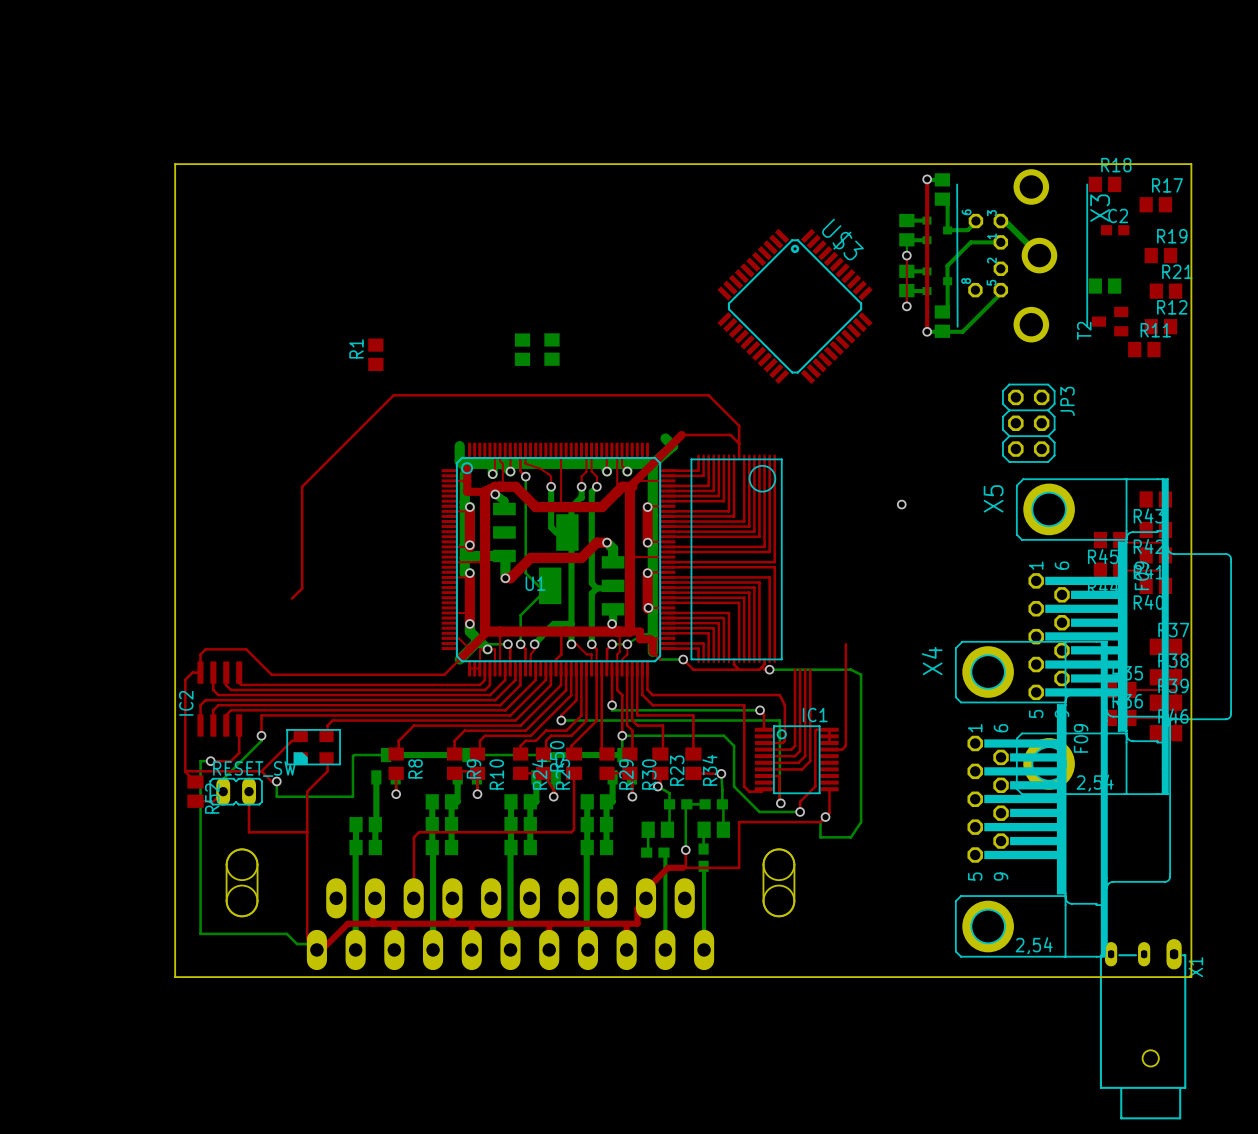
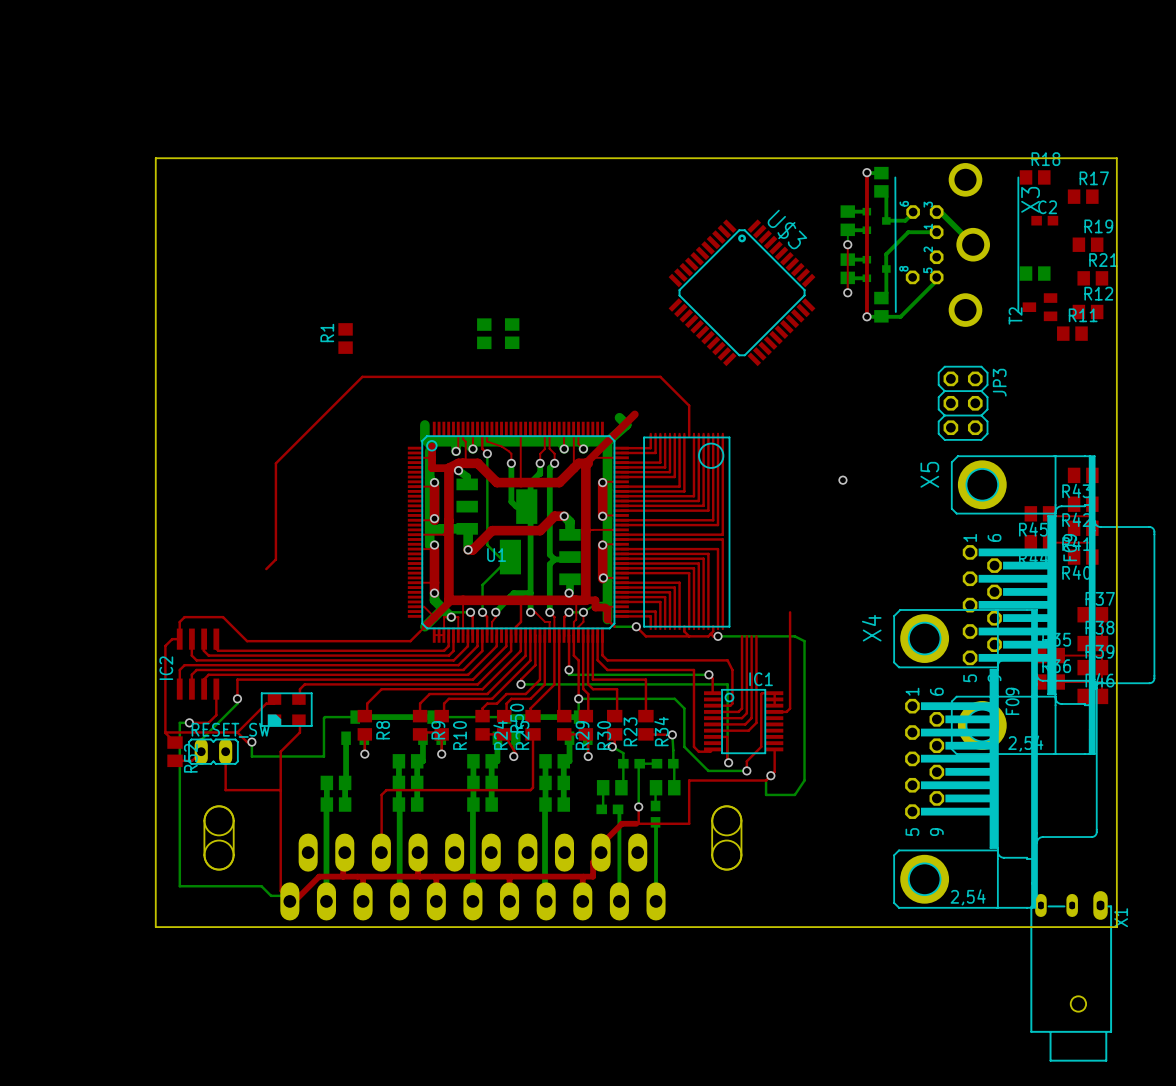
top track: (681, 434) (730, 434) (739, 443) -> none

